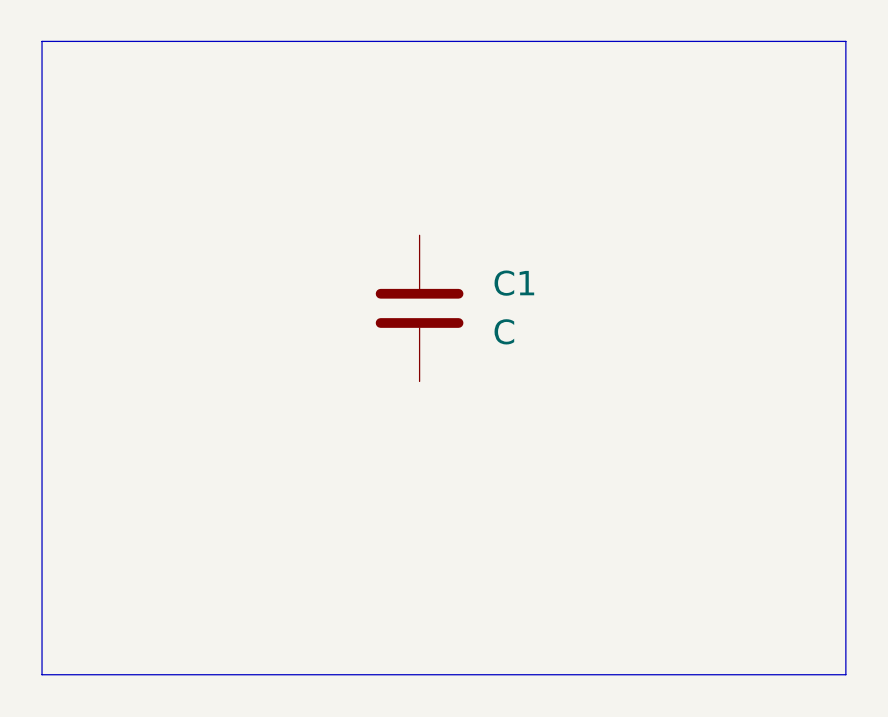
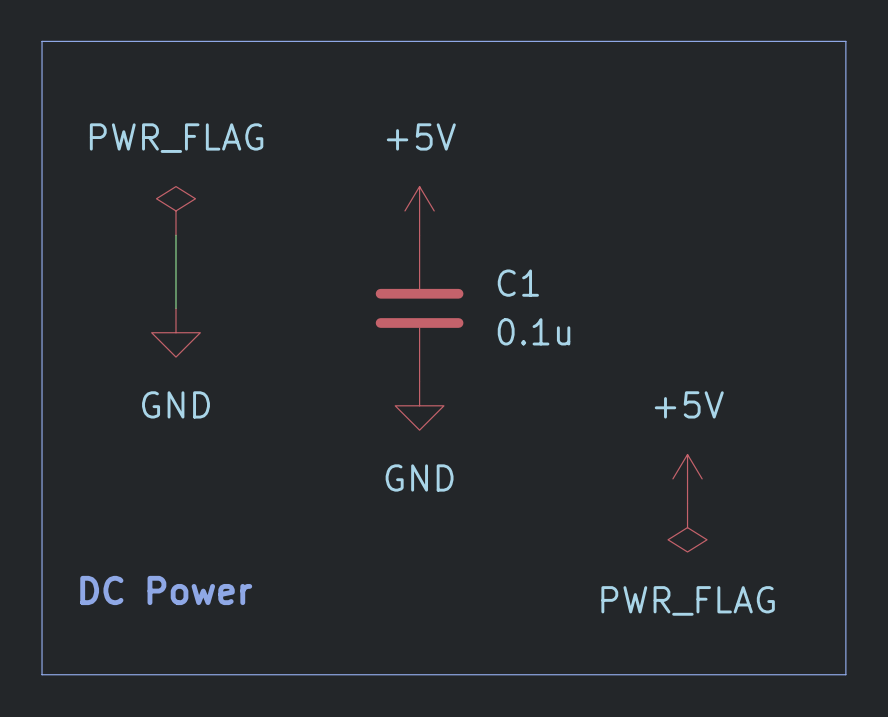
power symbol: none -> PWR_FLAG (175, 210)
power symbol: none -> +5V (419, 210)
wire: none -> (175, 235) (175, 308)
C1 value: C (504, 331) -> 0.1u (534, 331)
power symbol: none -> GND (175, 332)
power symbol: none -> GND (419, 405)
power symbol: none -> +5V (687, 478)
power symbol: none -> PWR_FLAG (687, 527)
text: none -> DC Power (166, 590)

